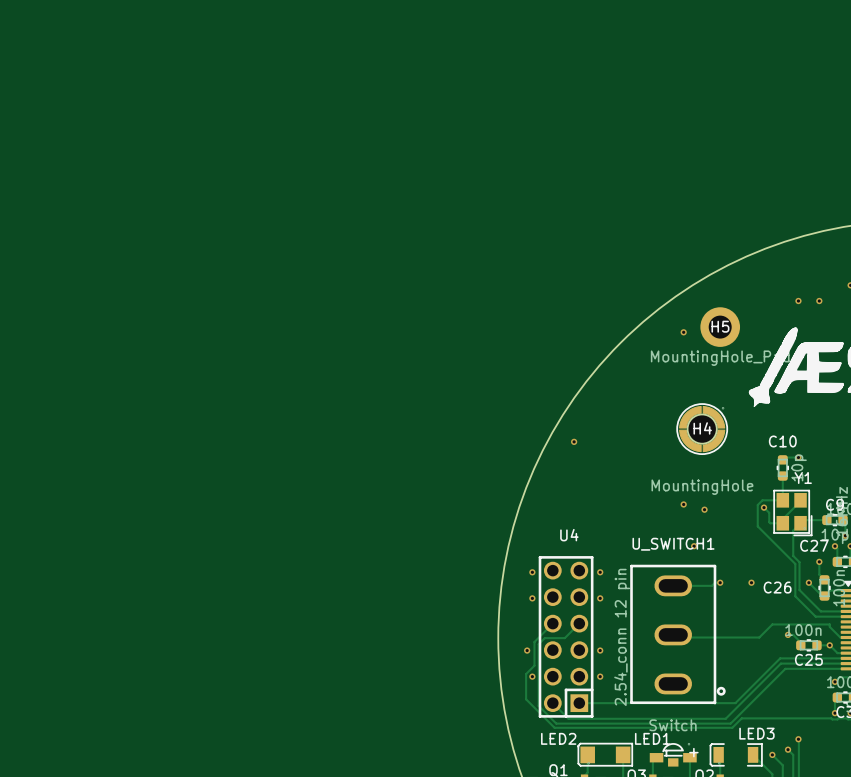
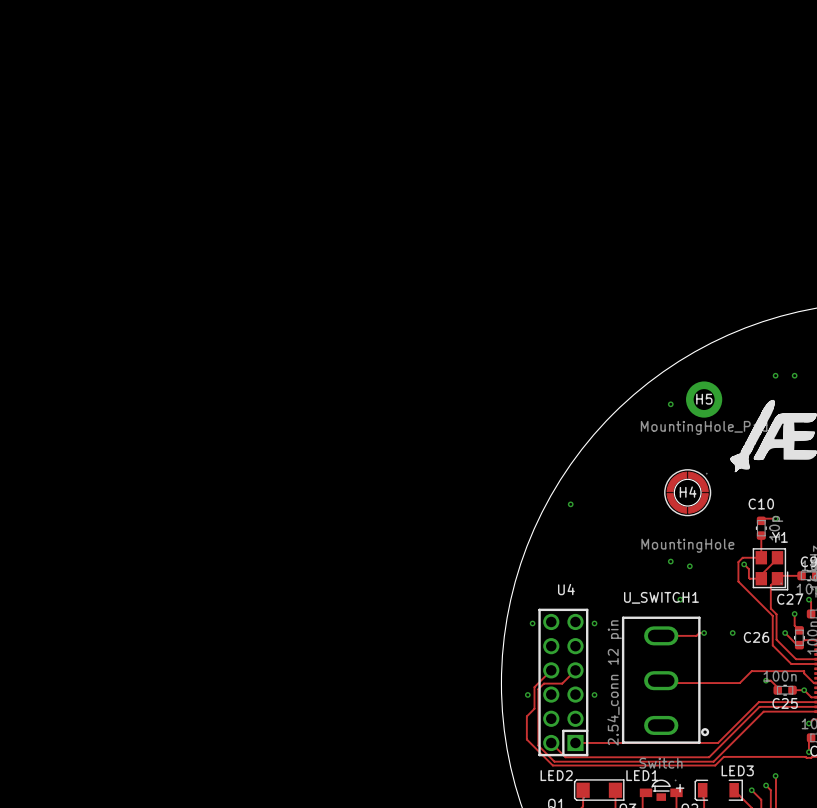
via: (532, 598) -> none
via: (600, 598) -> none
via: (532, 676) -> none
via: (600, 676) -> none

